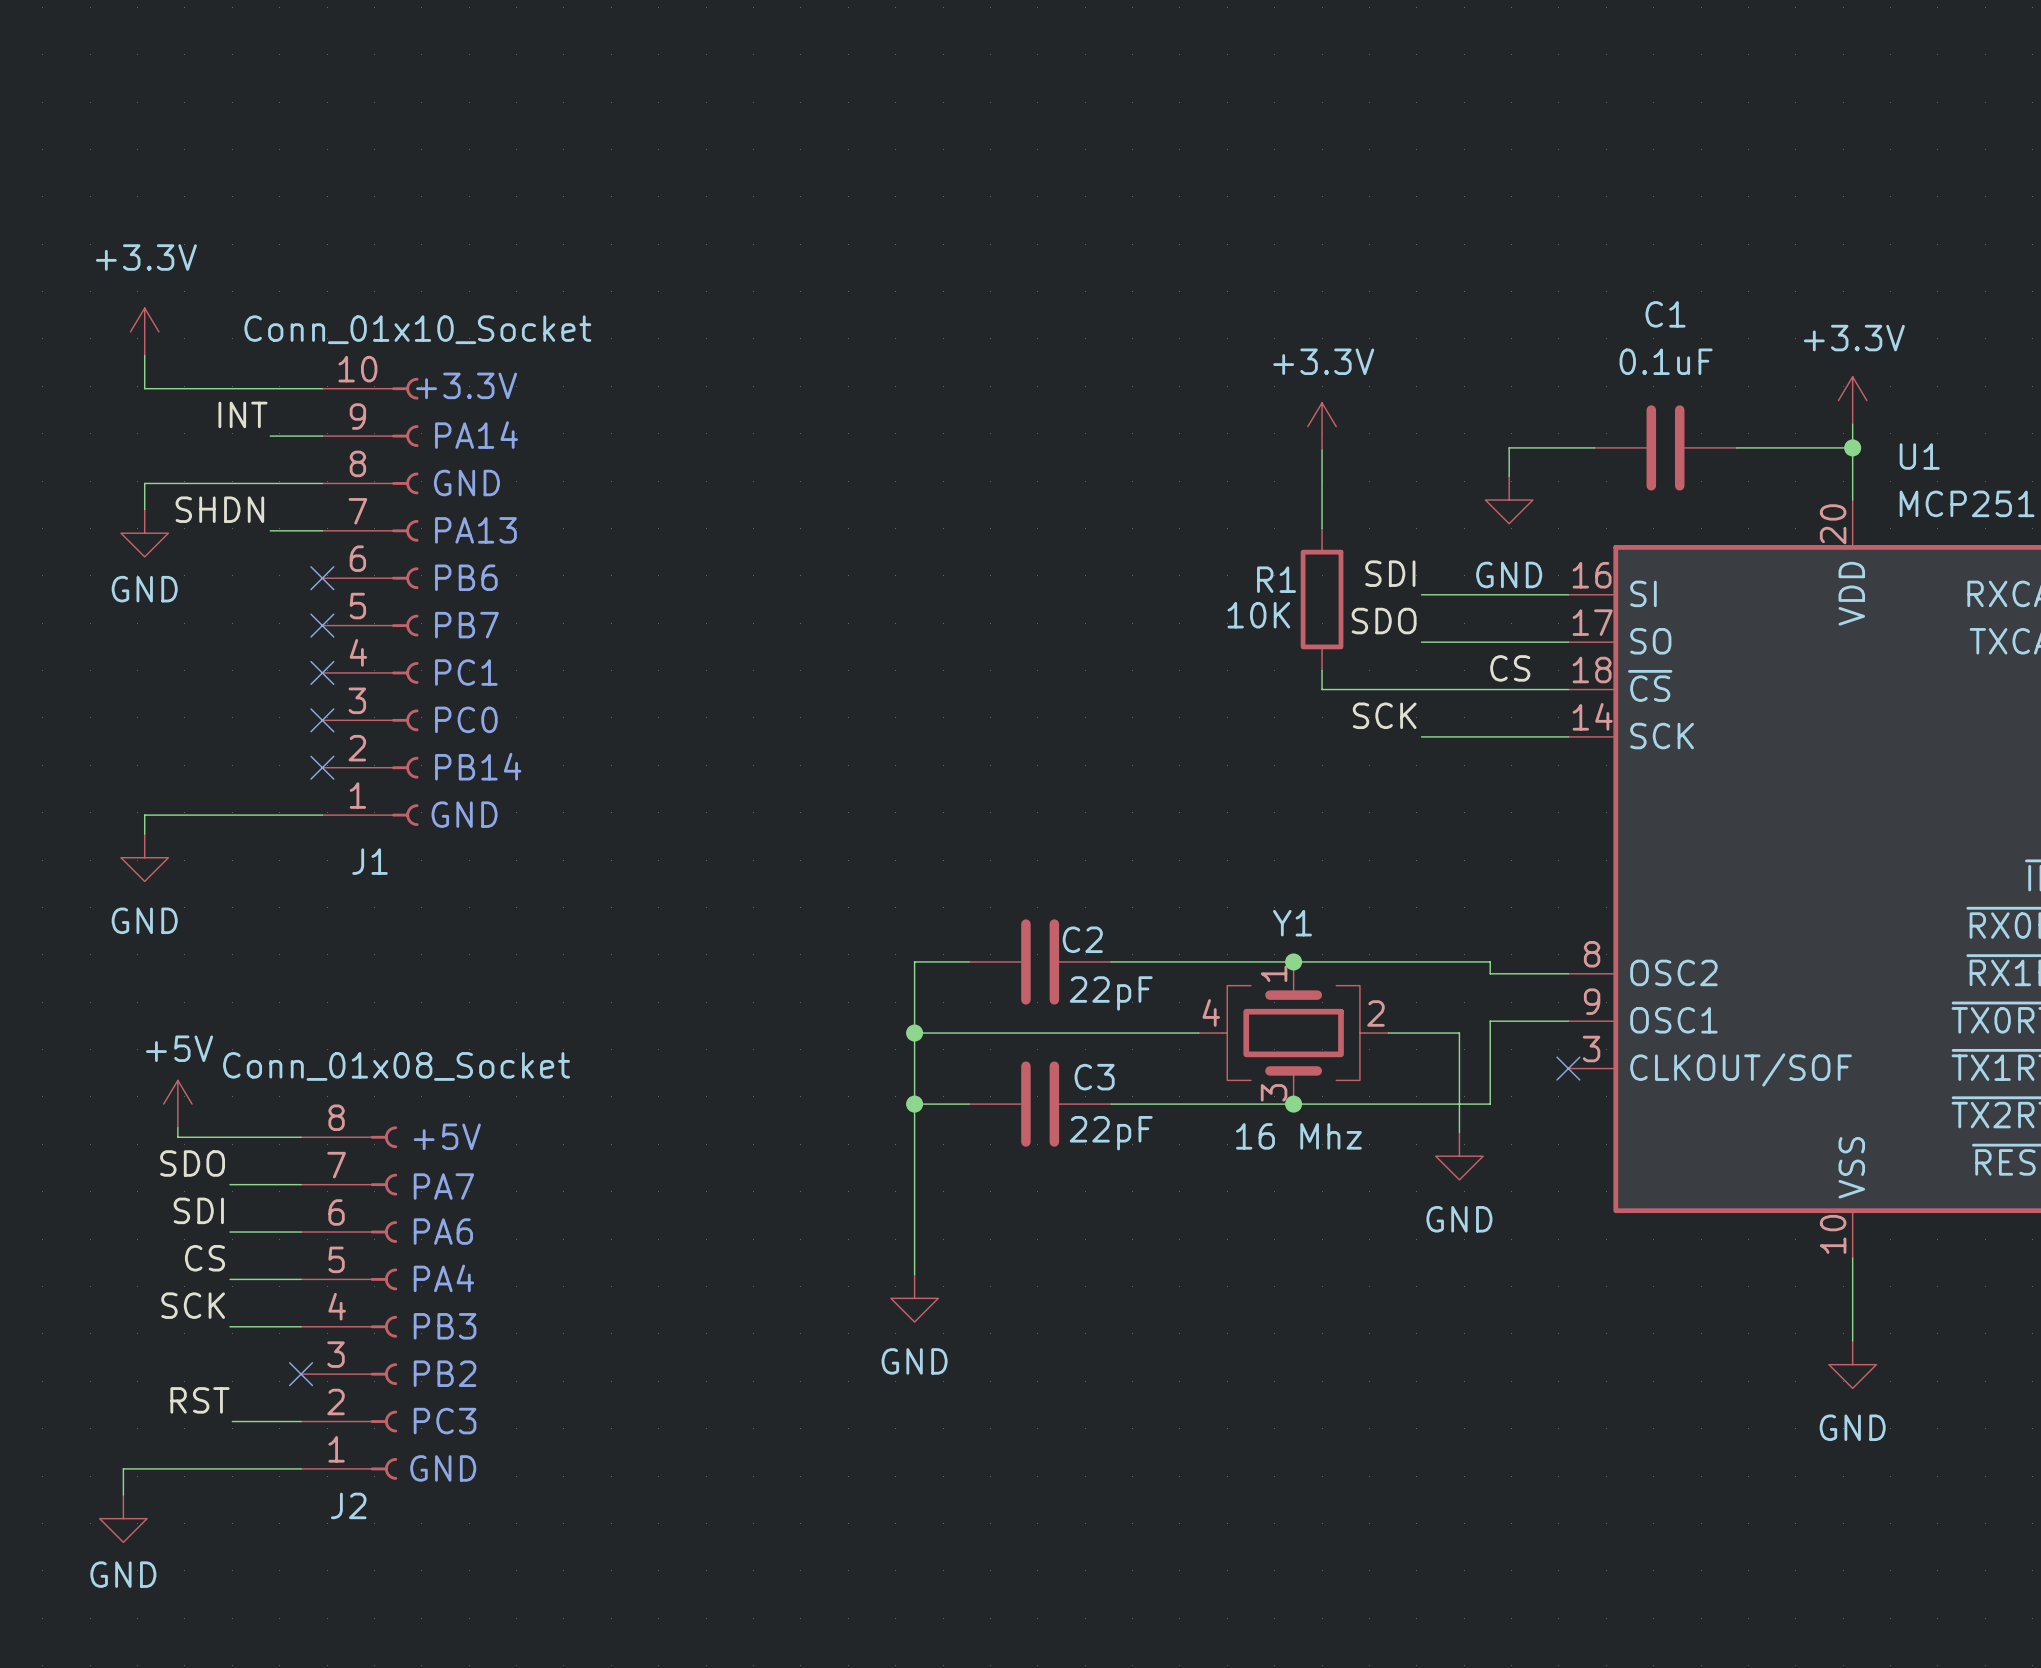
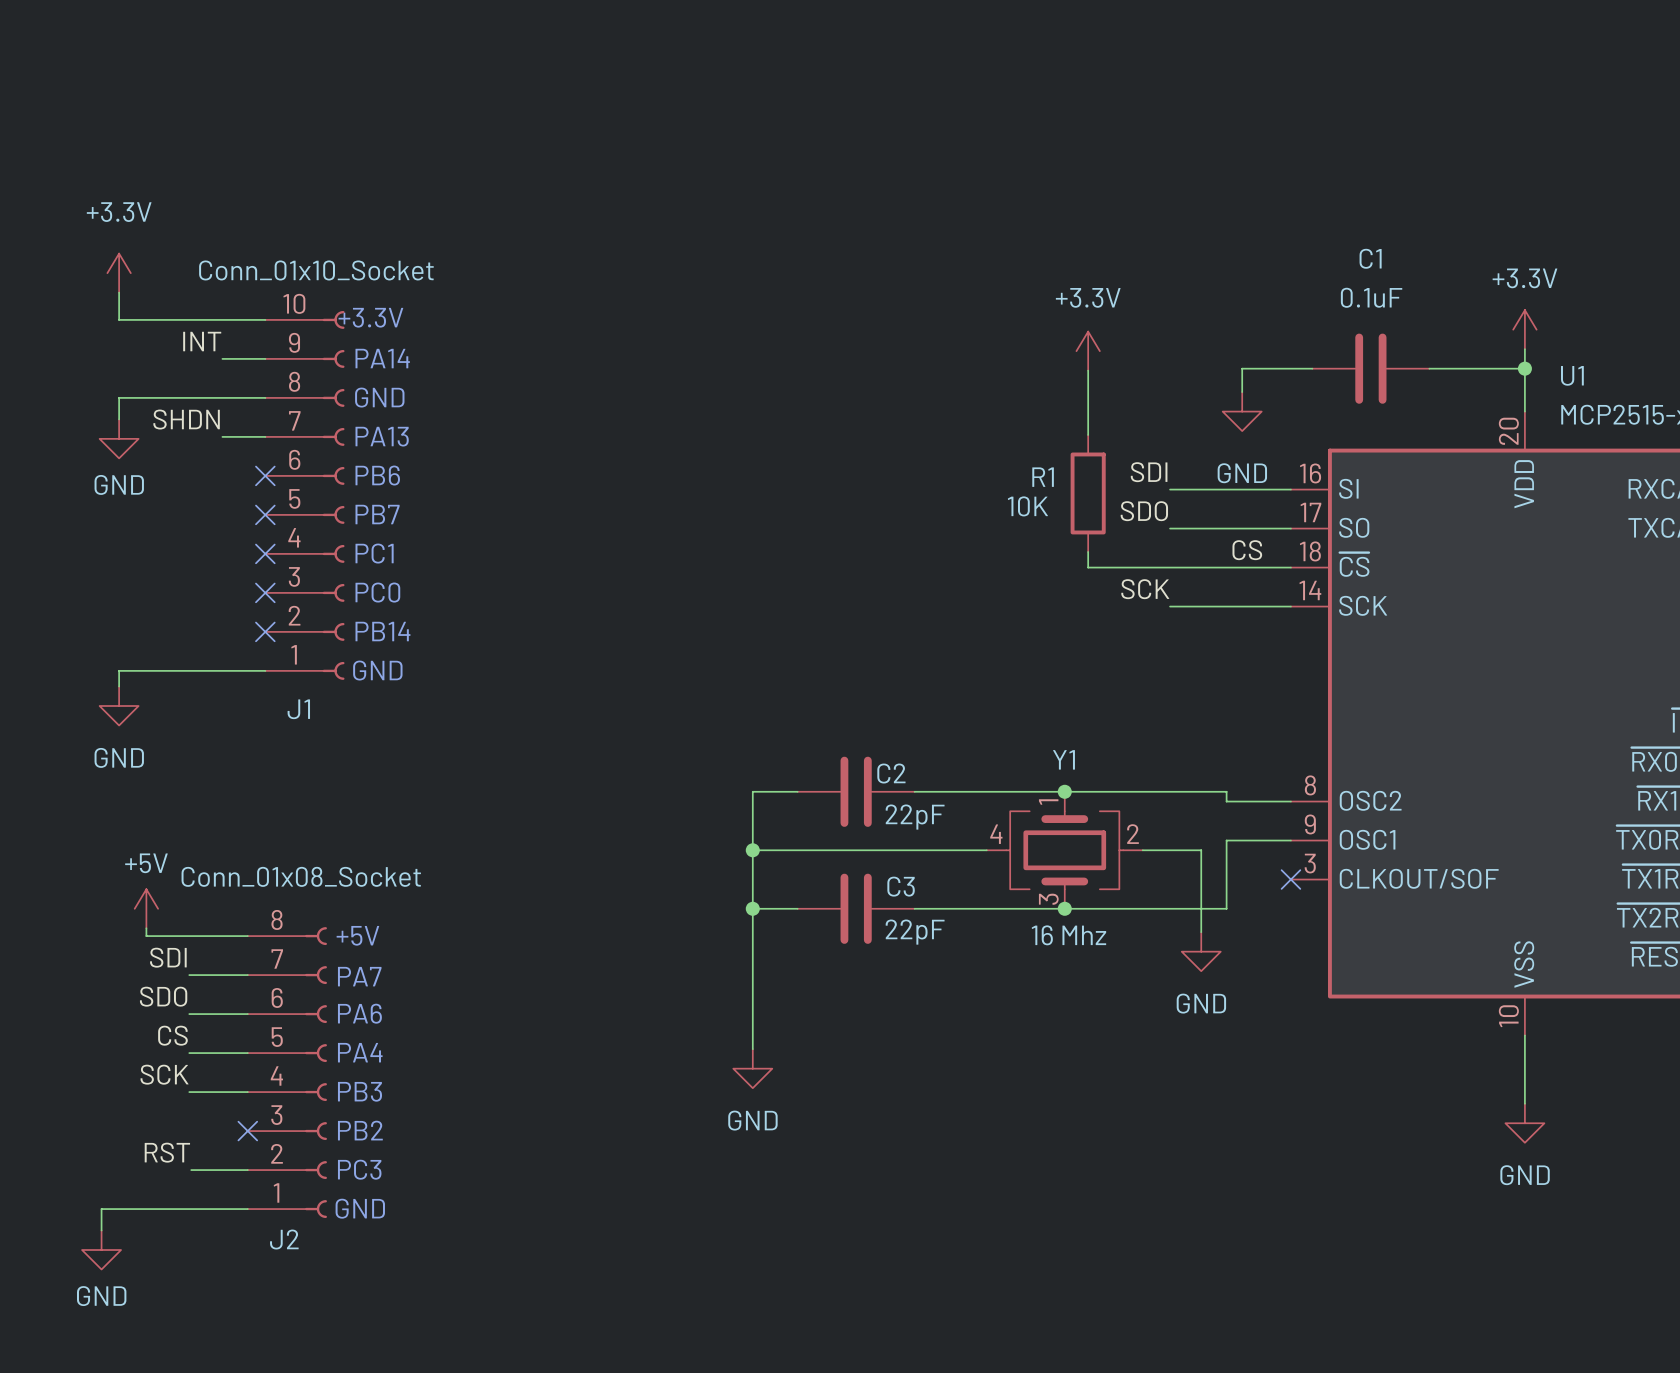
label: SDO (192, 1163) -> SDI (168, 957)
label: SDI (198, 1210) -> SDO (163, 996)

